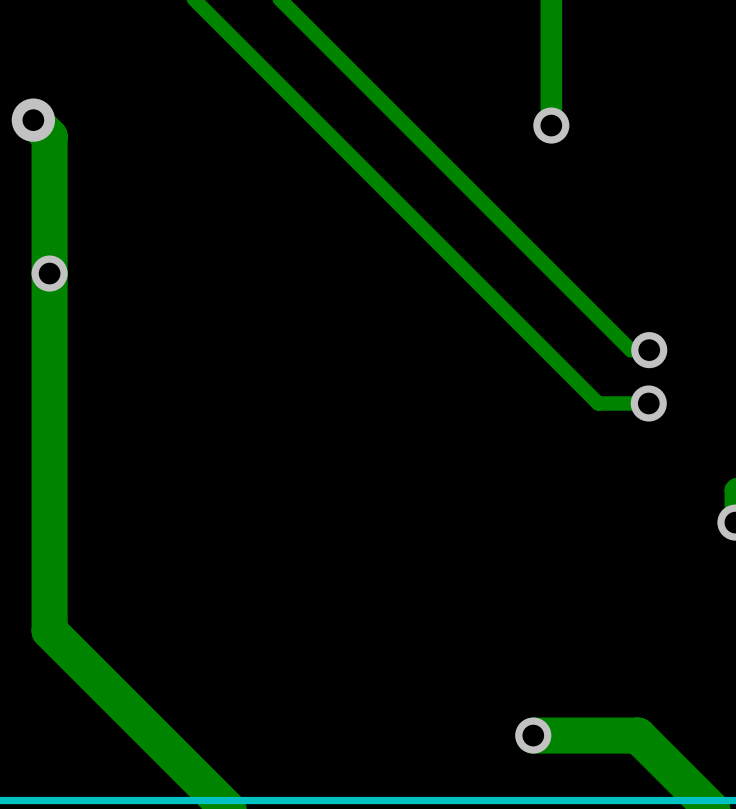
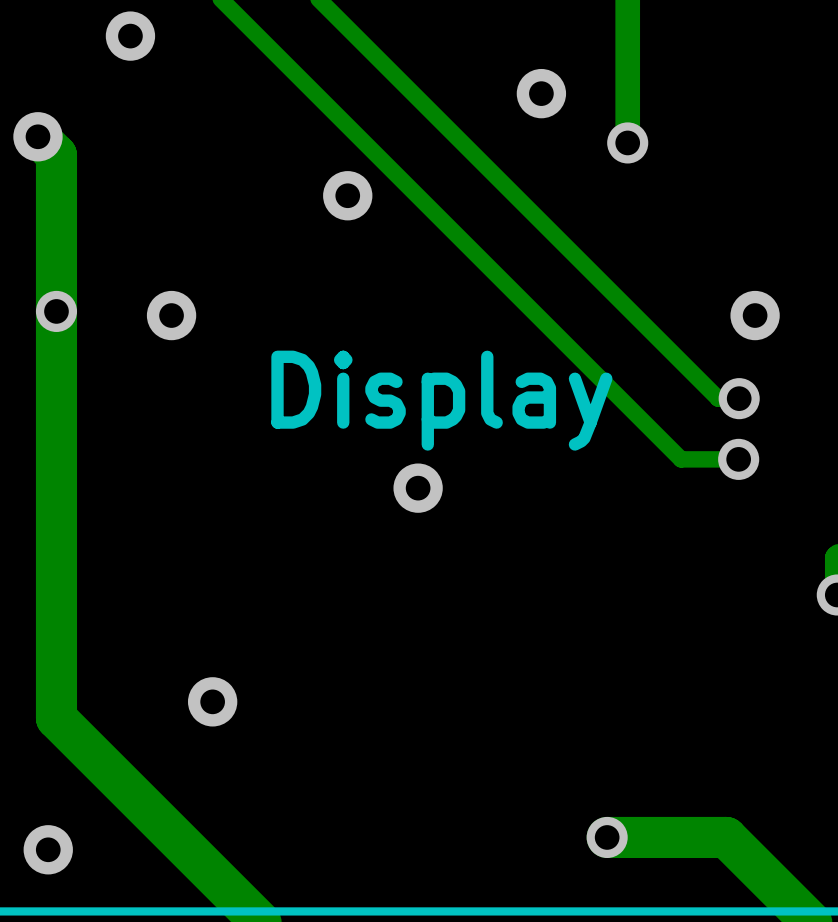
via: none -> (130, 36)
via: none -> (541, 93)
via: none -> (347, 195)
via: none -> (171, 315)
via: none -> (755, 315)
text: none -> Display (441, 400)
via: none -> (418, 488)
via: none -> (212, 701)
via: none -> (48, 849)

